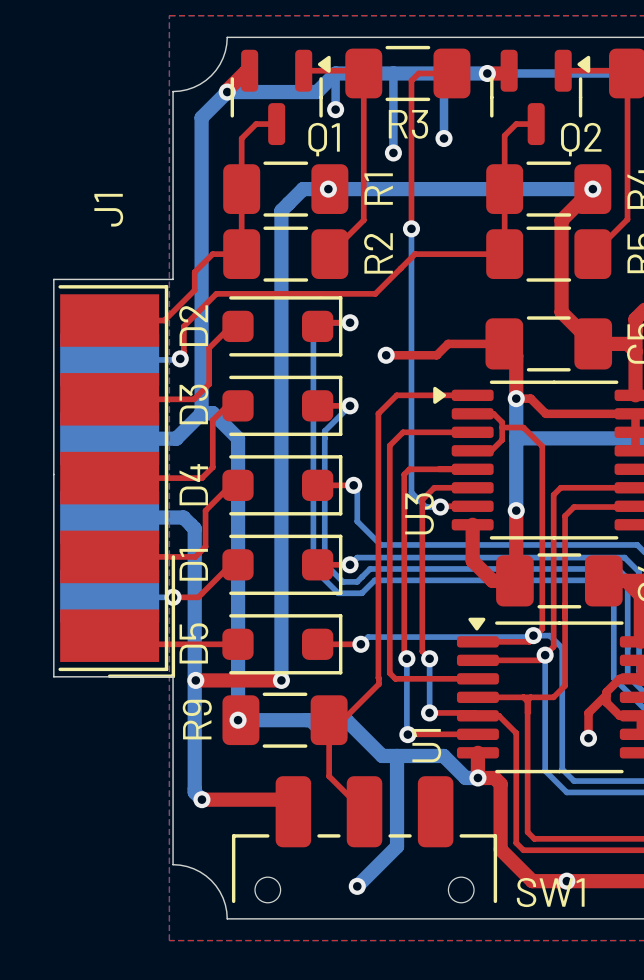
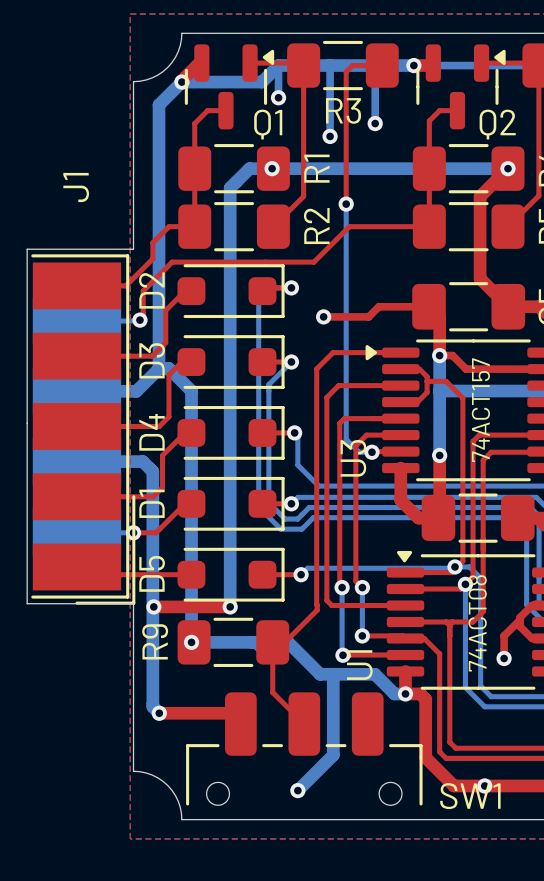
U3 value: none -> 74ACT157 (480, 410)
U1 value: none -> 74ACT08 (477, 623)

